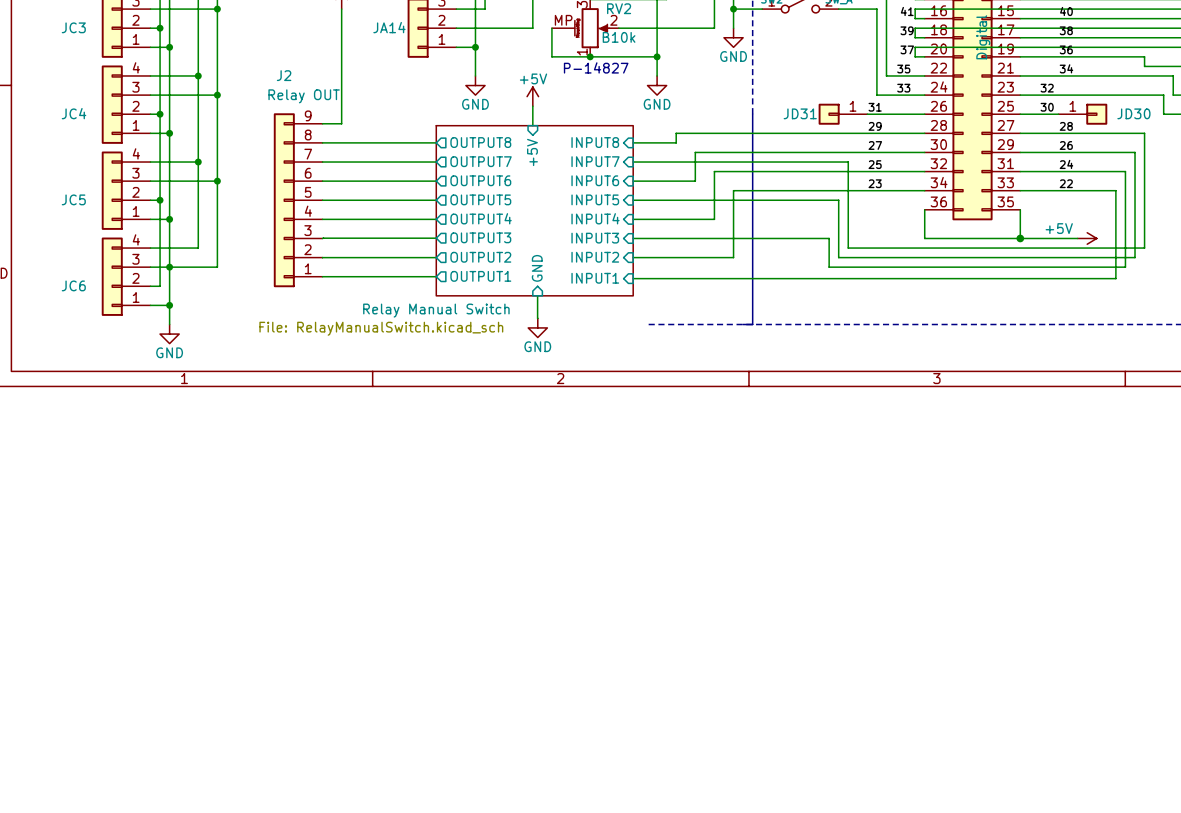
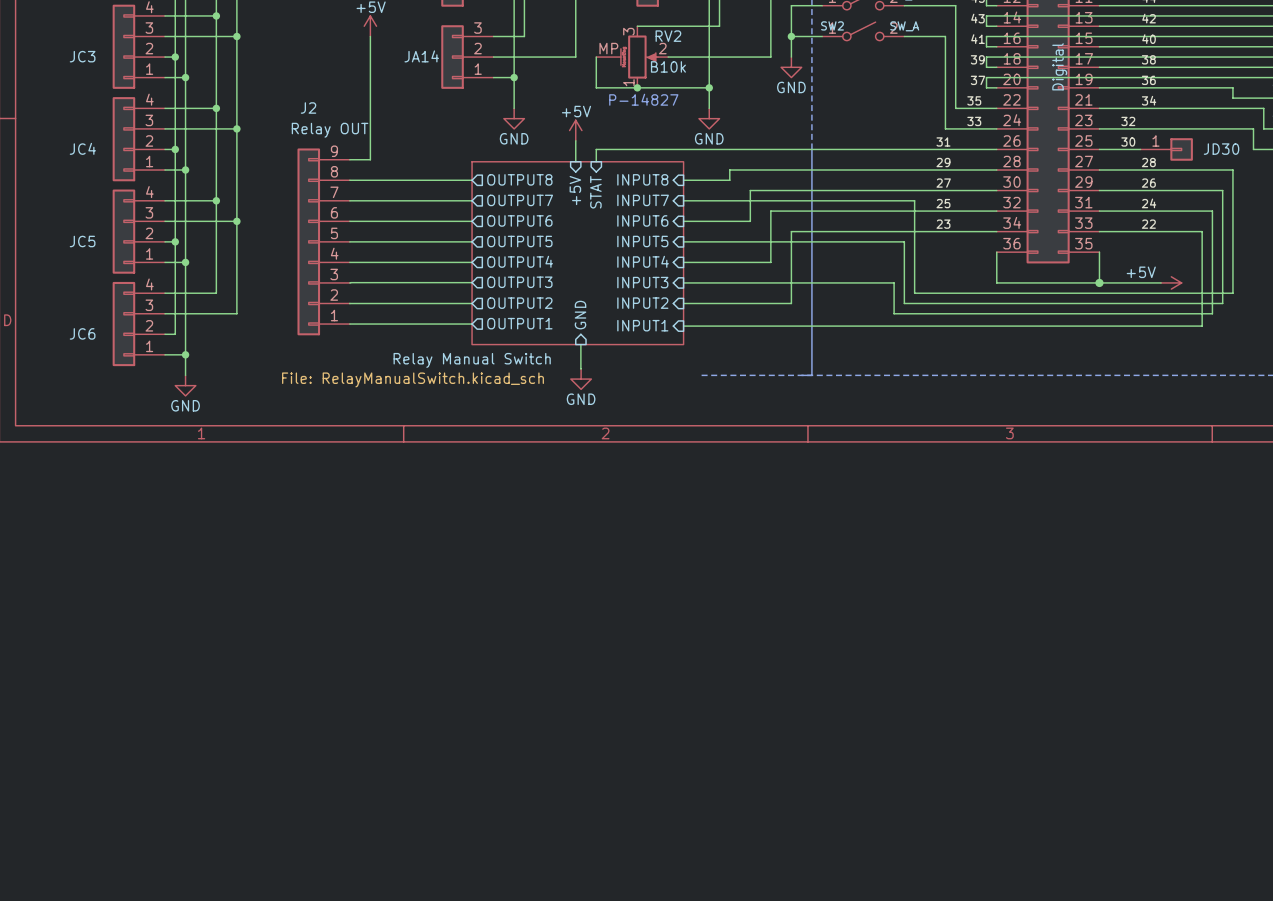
JD31: (843, 114) -> none
wire: none -> (935, 149) (596, 149) (596, 161)
sheet pin: none -> STAT (595, 192)
junction: (169, 267) -> none

